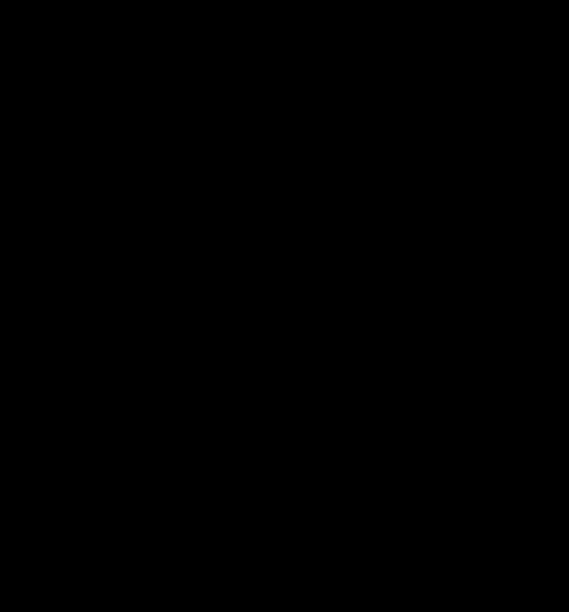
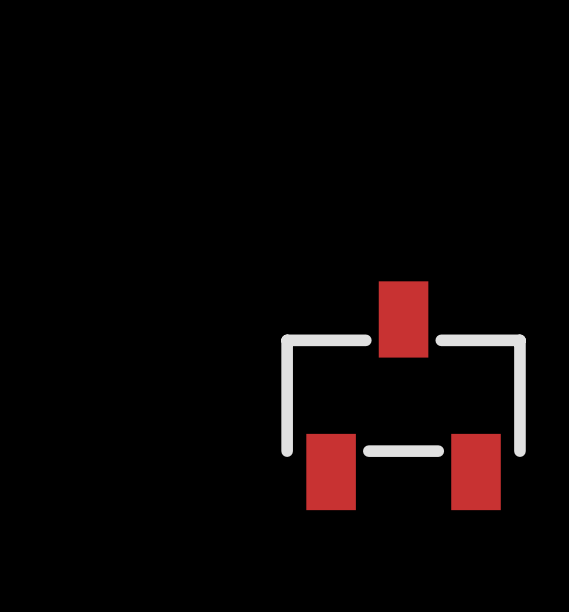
part: none -> (403, 395)

